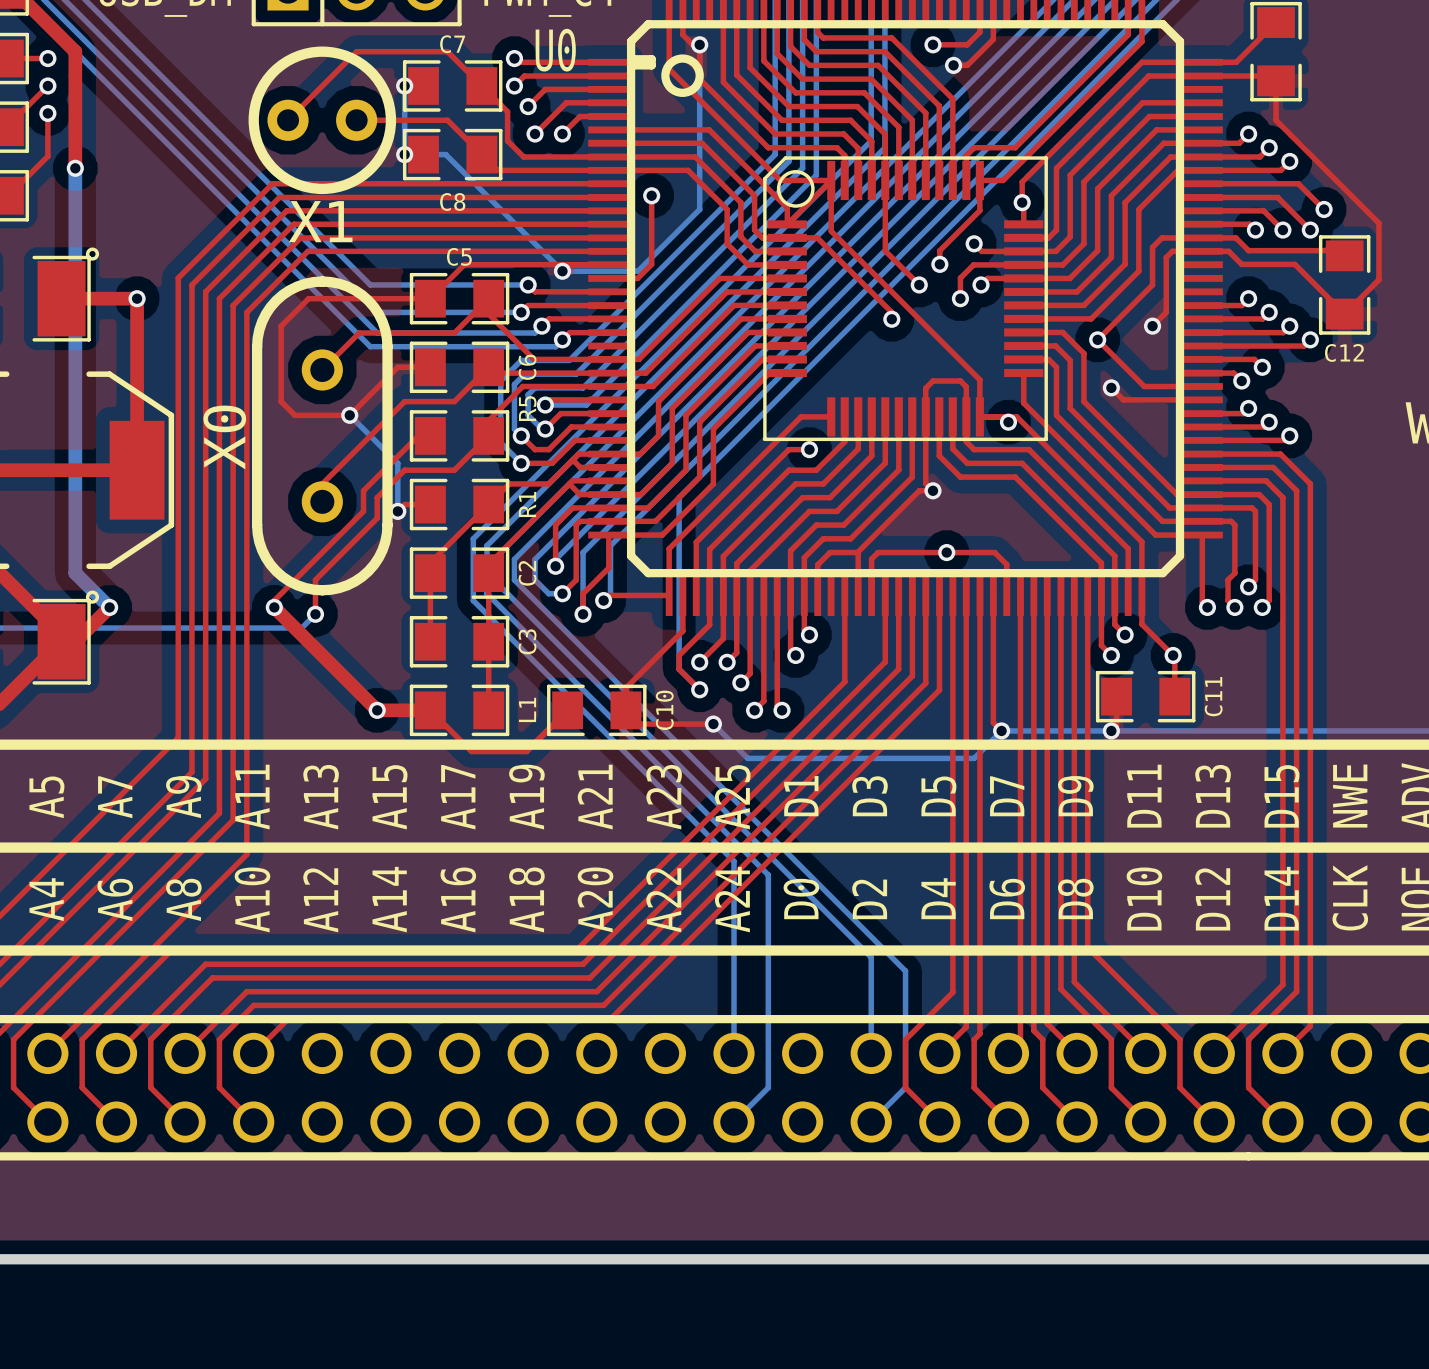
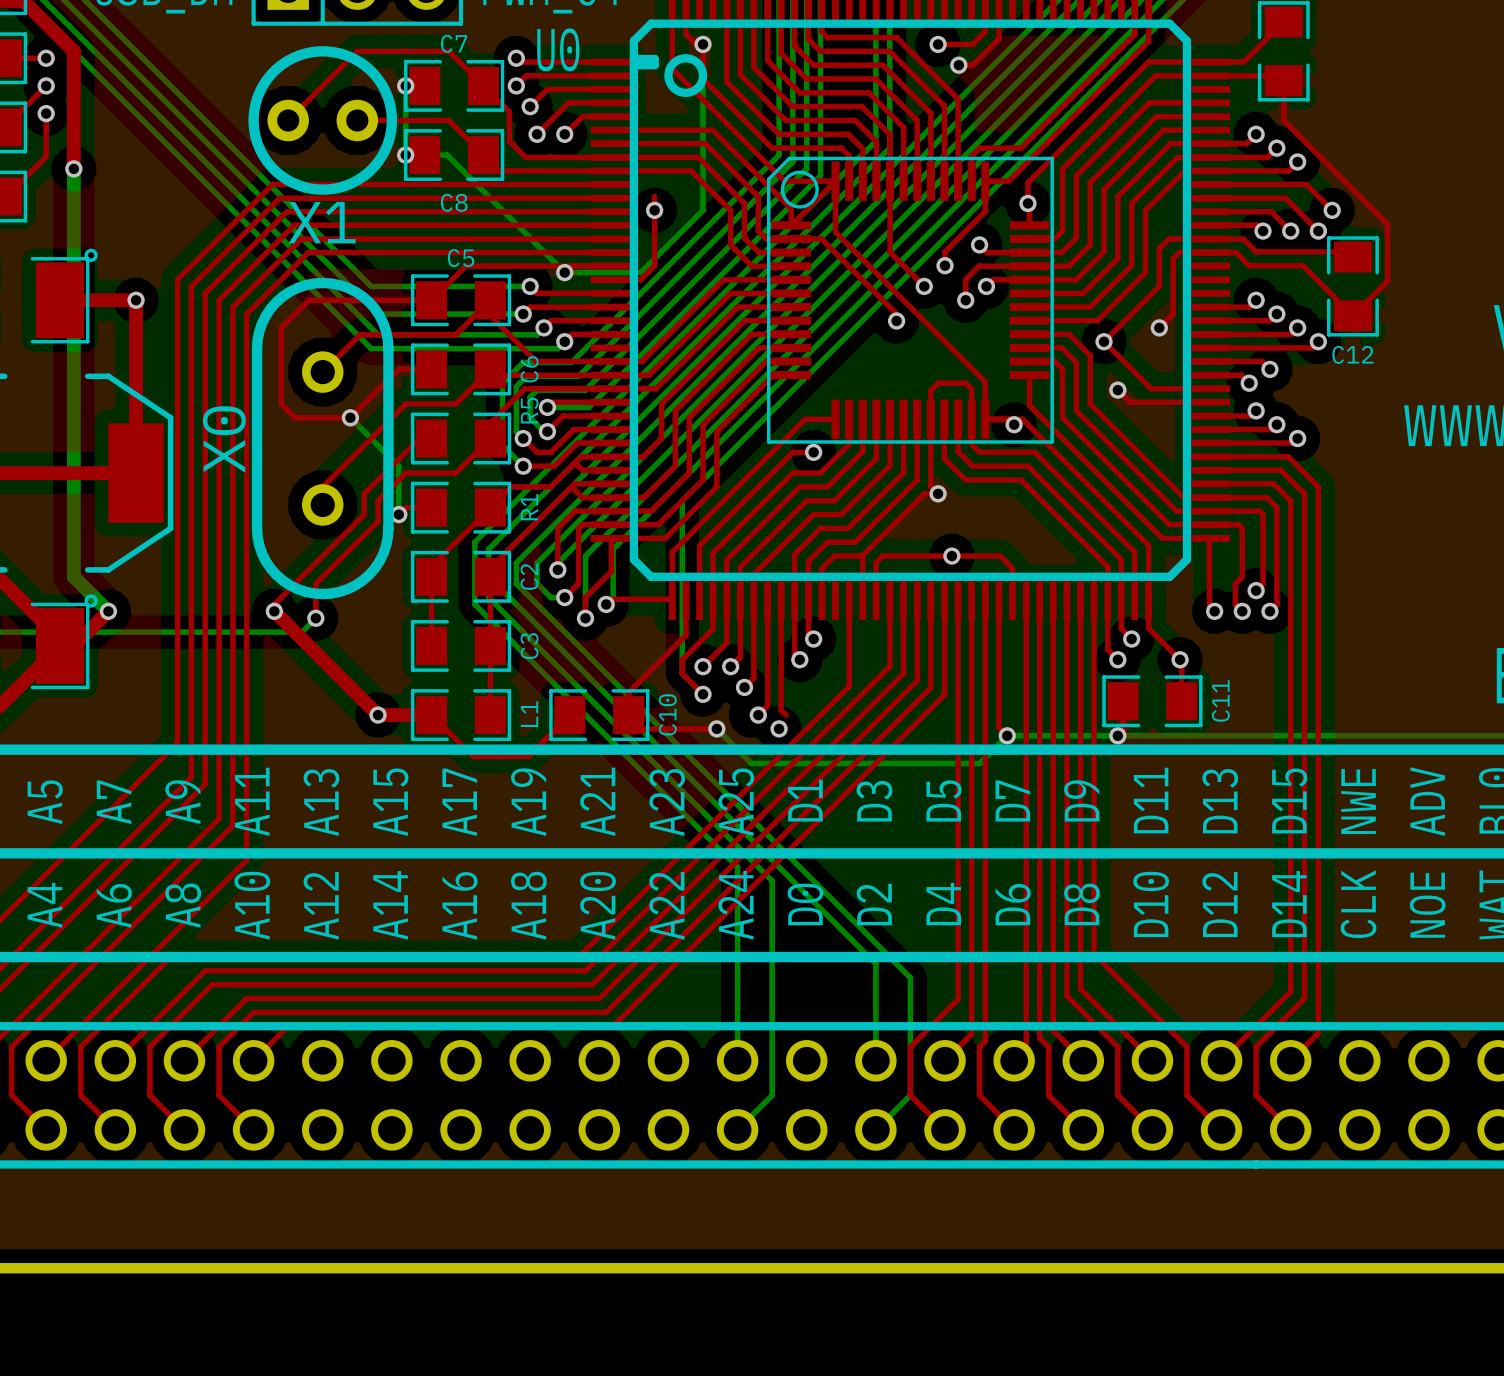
via position: (651, 195) -> (654, 210)
via position: (782, 710) -> (779, 728)

